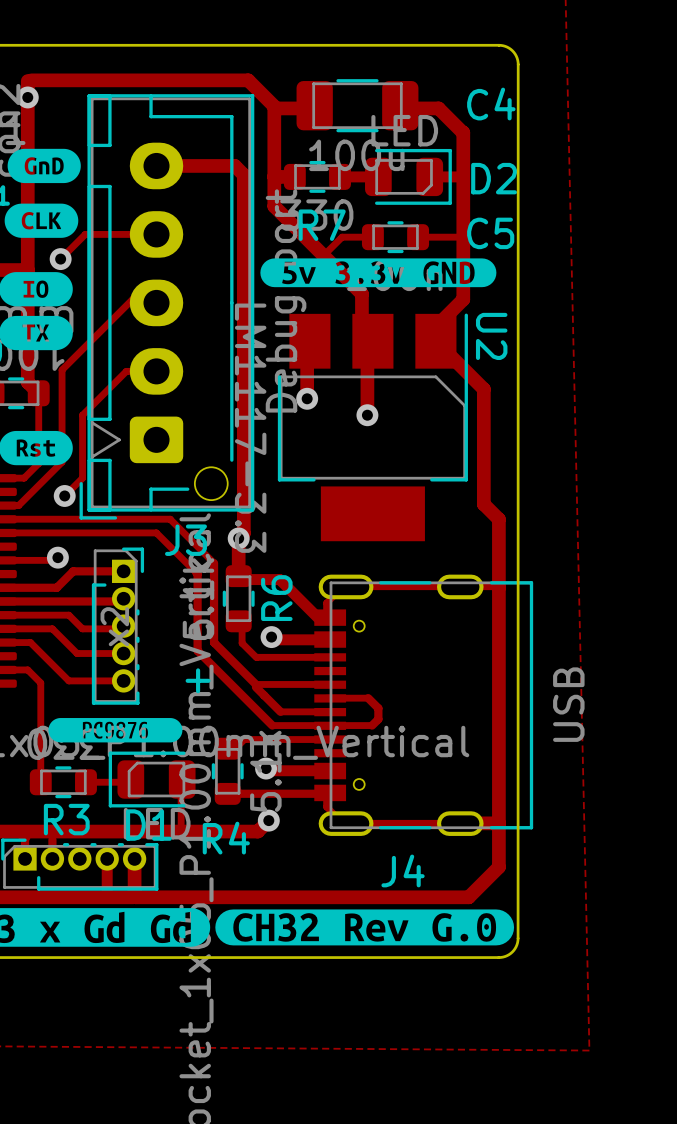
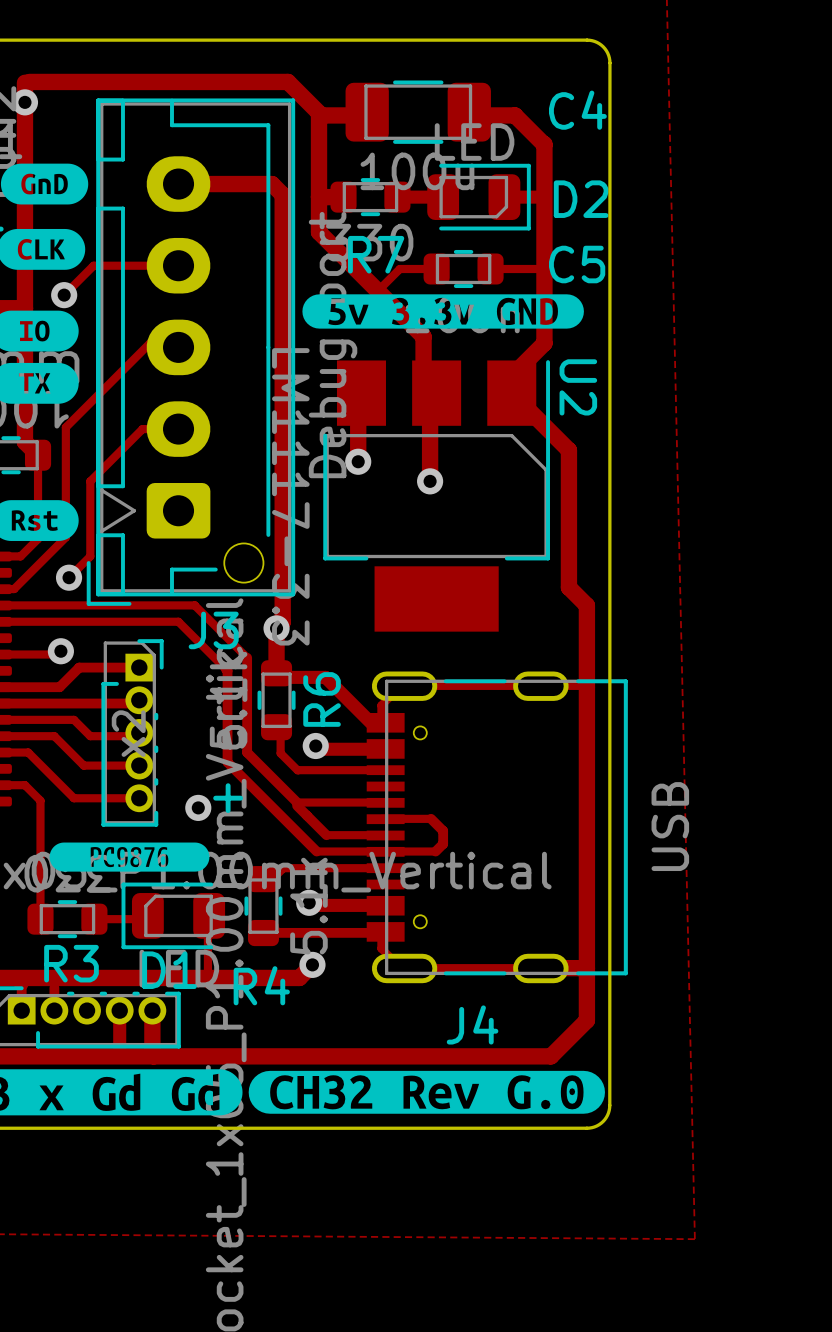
via: none -> (198, 807)

